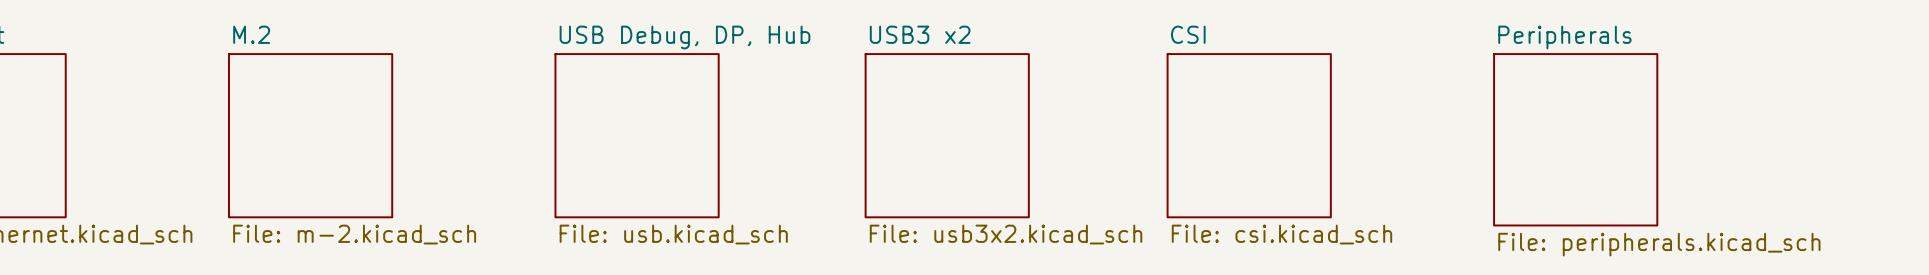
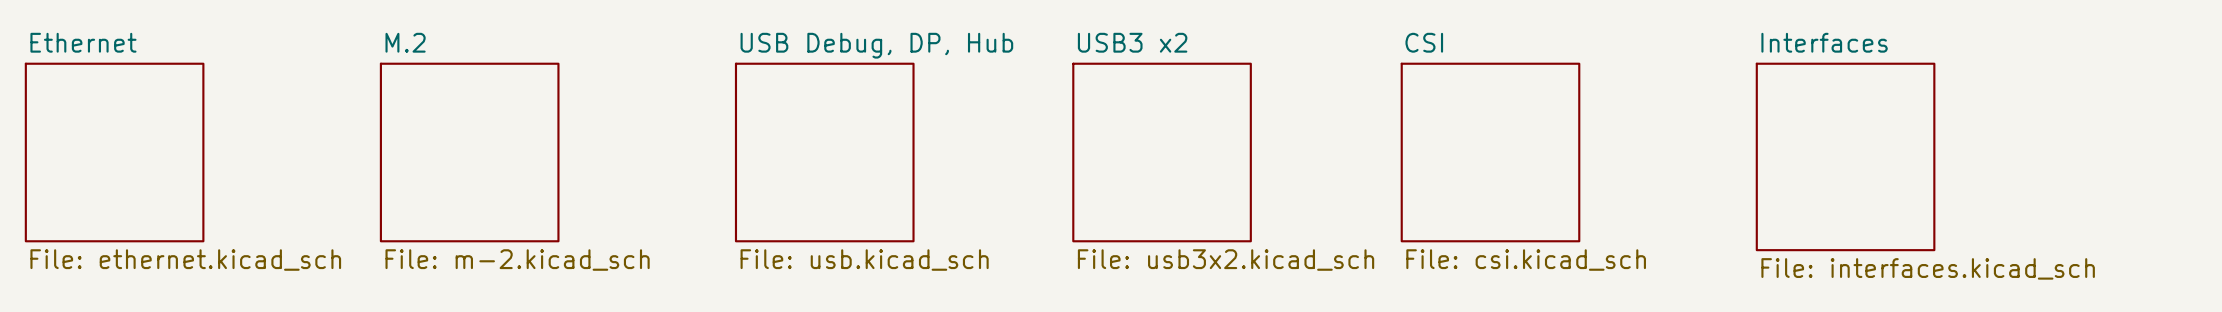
sheet Peripherals name: Peripherals (1564, 37) -> Interfaces (1824, 42)
sheet Peripherals value: File: peripherals.kicad_sch (1659, 244) -> File: interfaces.kicad_sch (1928, 268)

